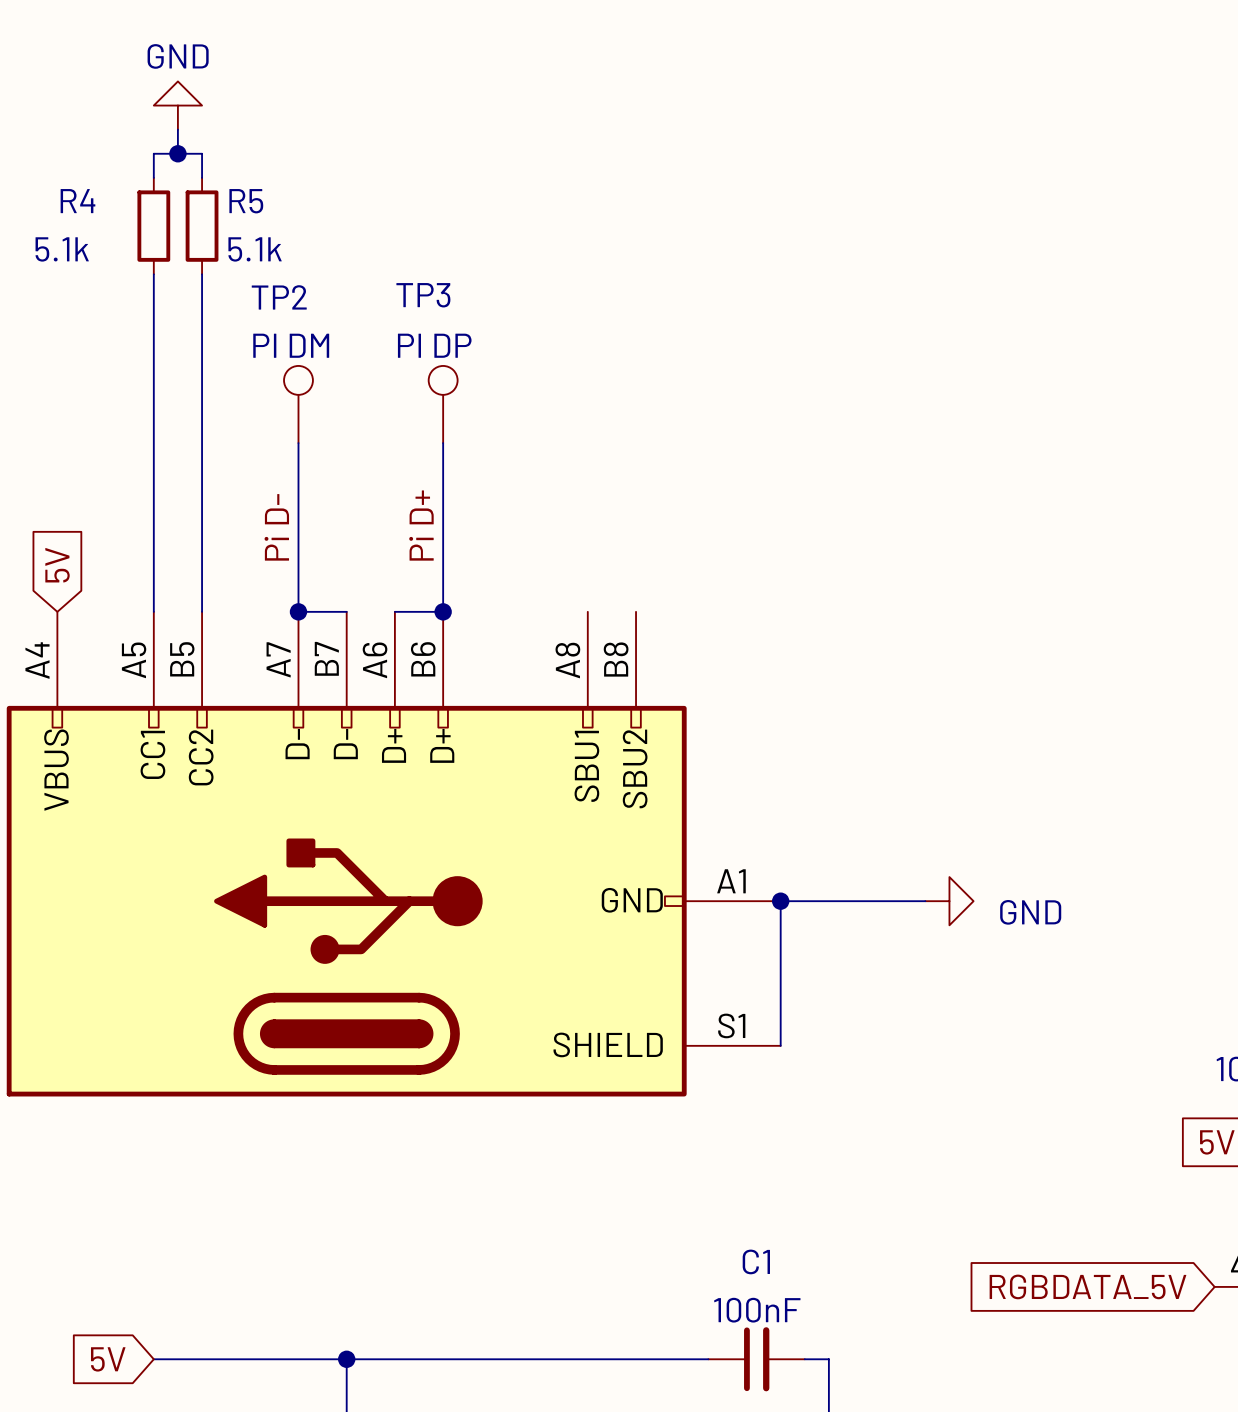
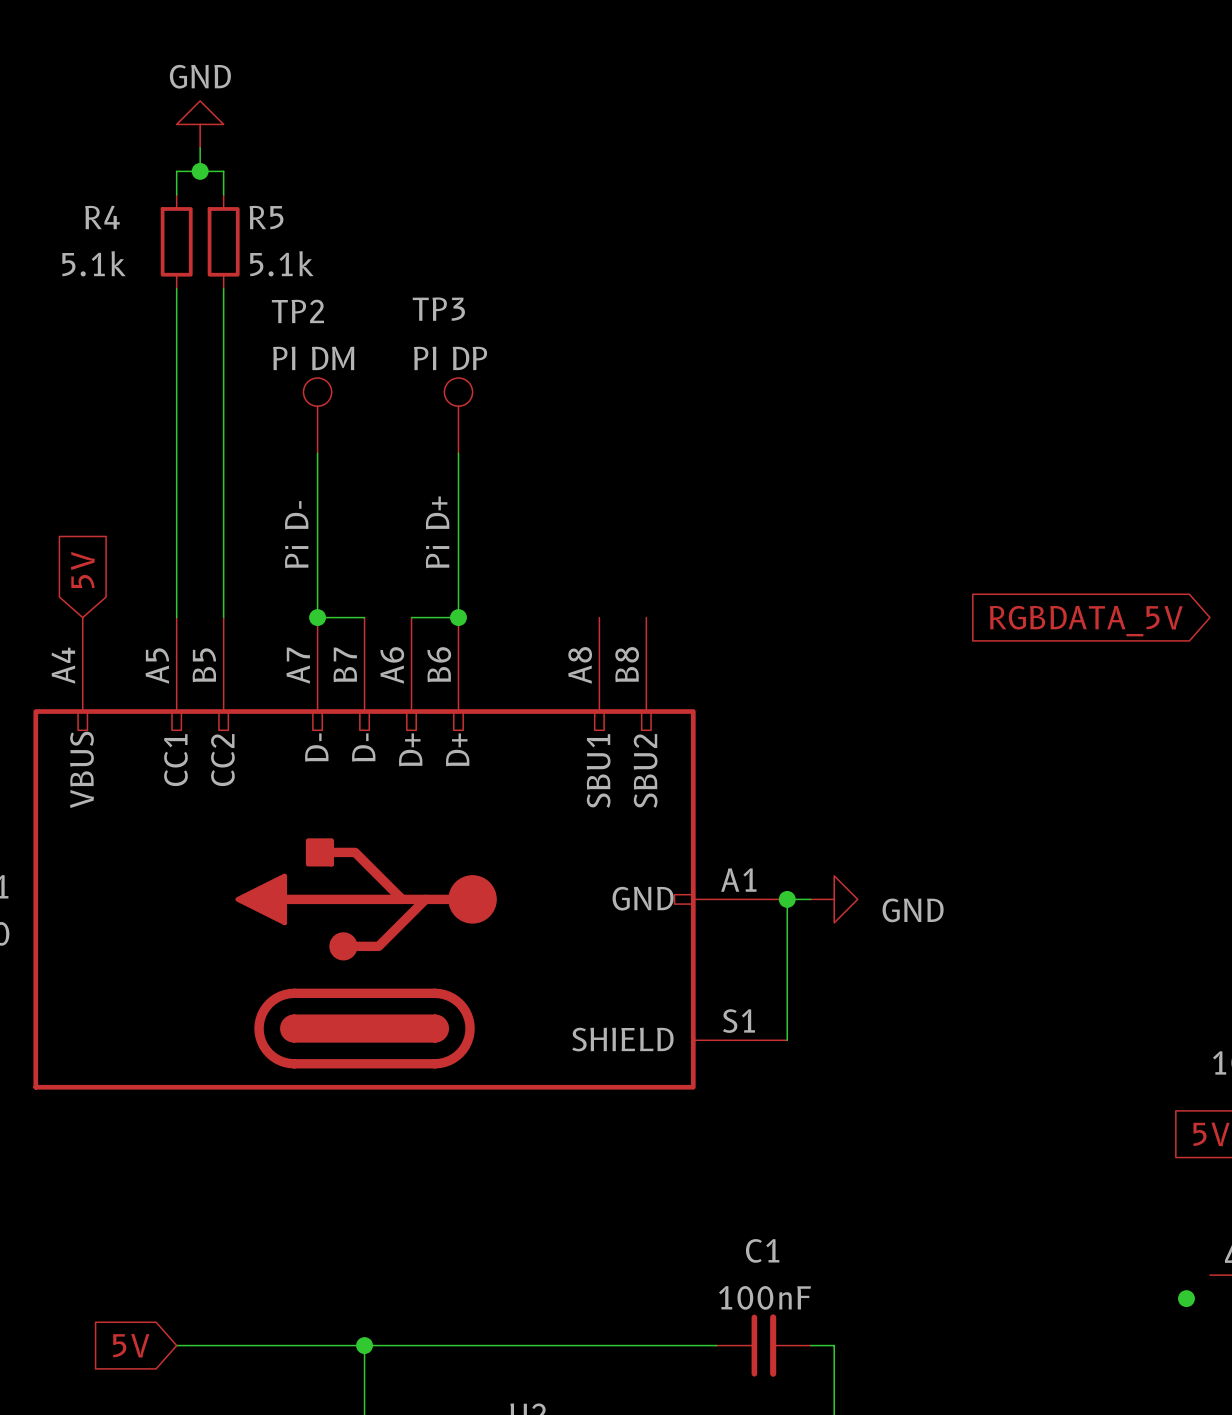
global label: none -> RGBDATA_5V (1086, 621)
wire: (804, 901) (925, 901) -> none
power symbol position: GND (949, 901) -> GND (834, 899)
global label: RGBDATA_5V (1088, 1286) -> none
junction: none -> (1186, 1298)

